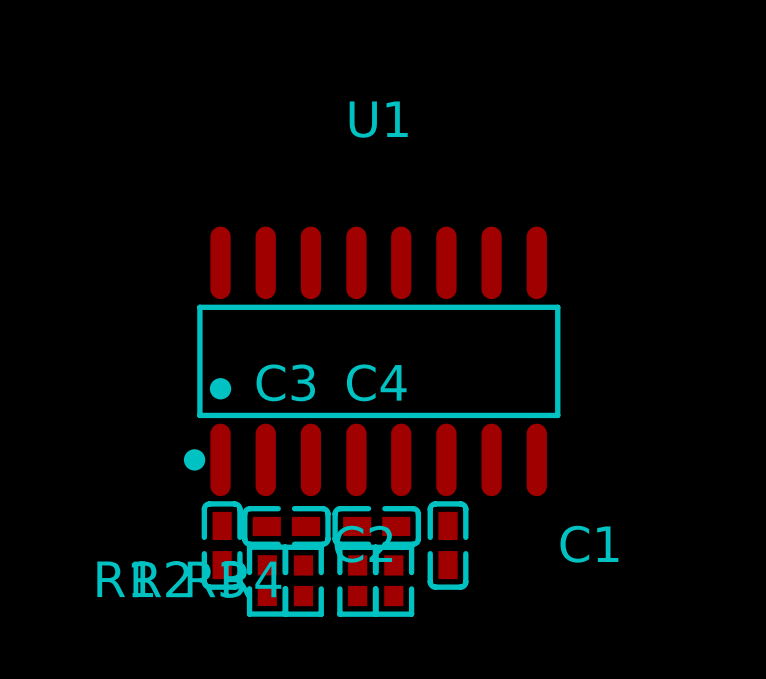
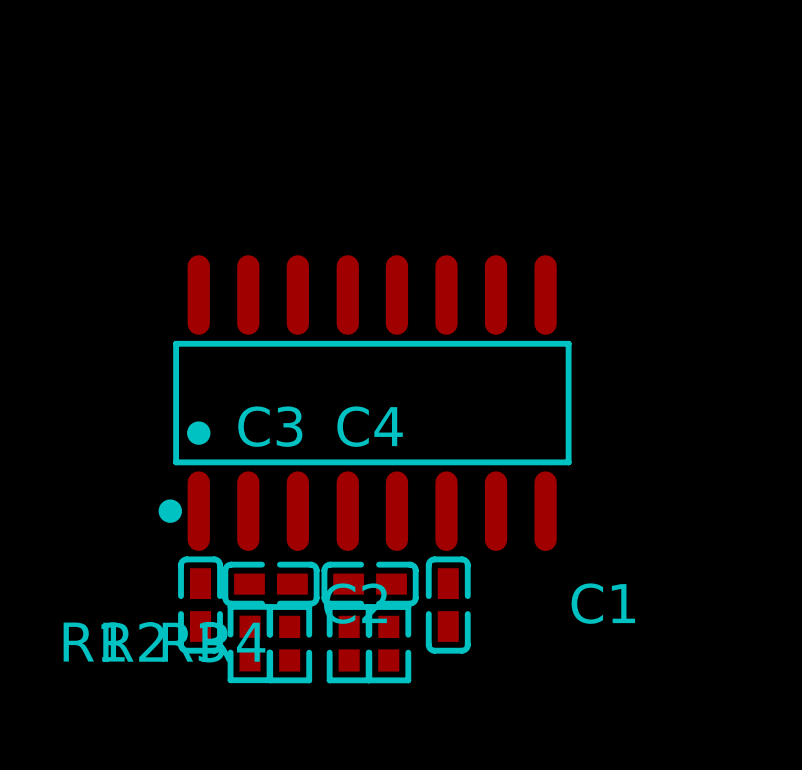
U1 name: U1 (378, 119) -> none

